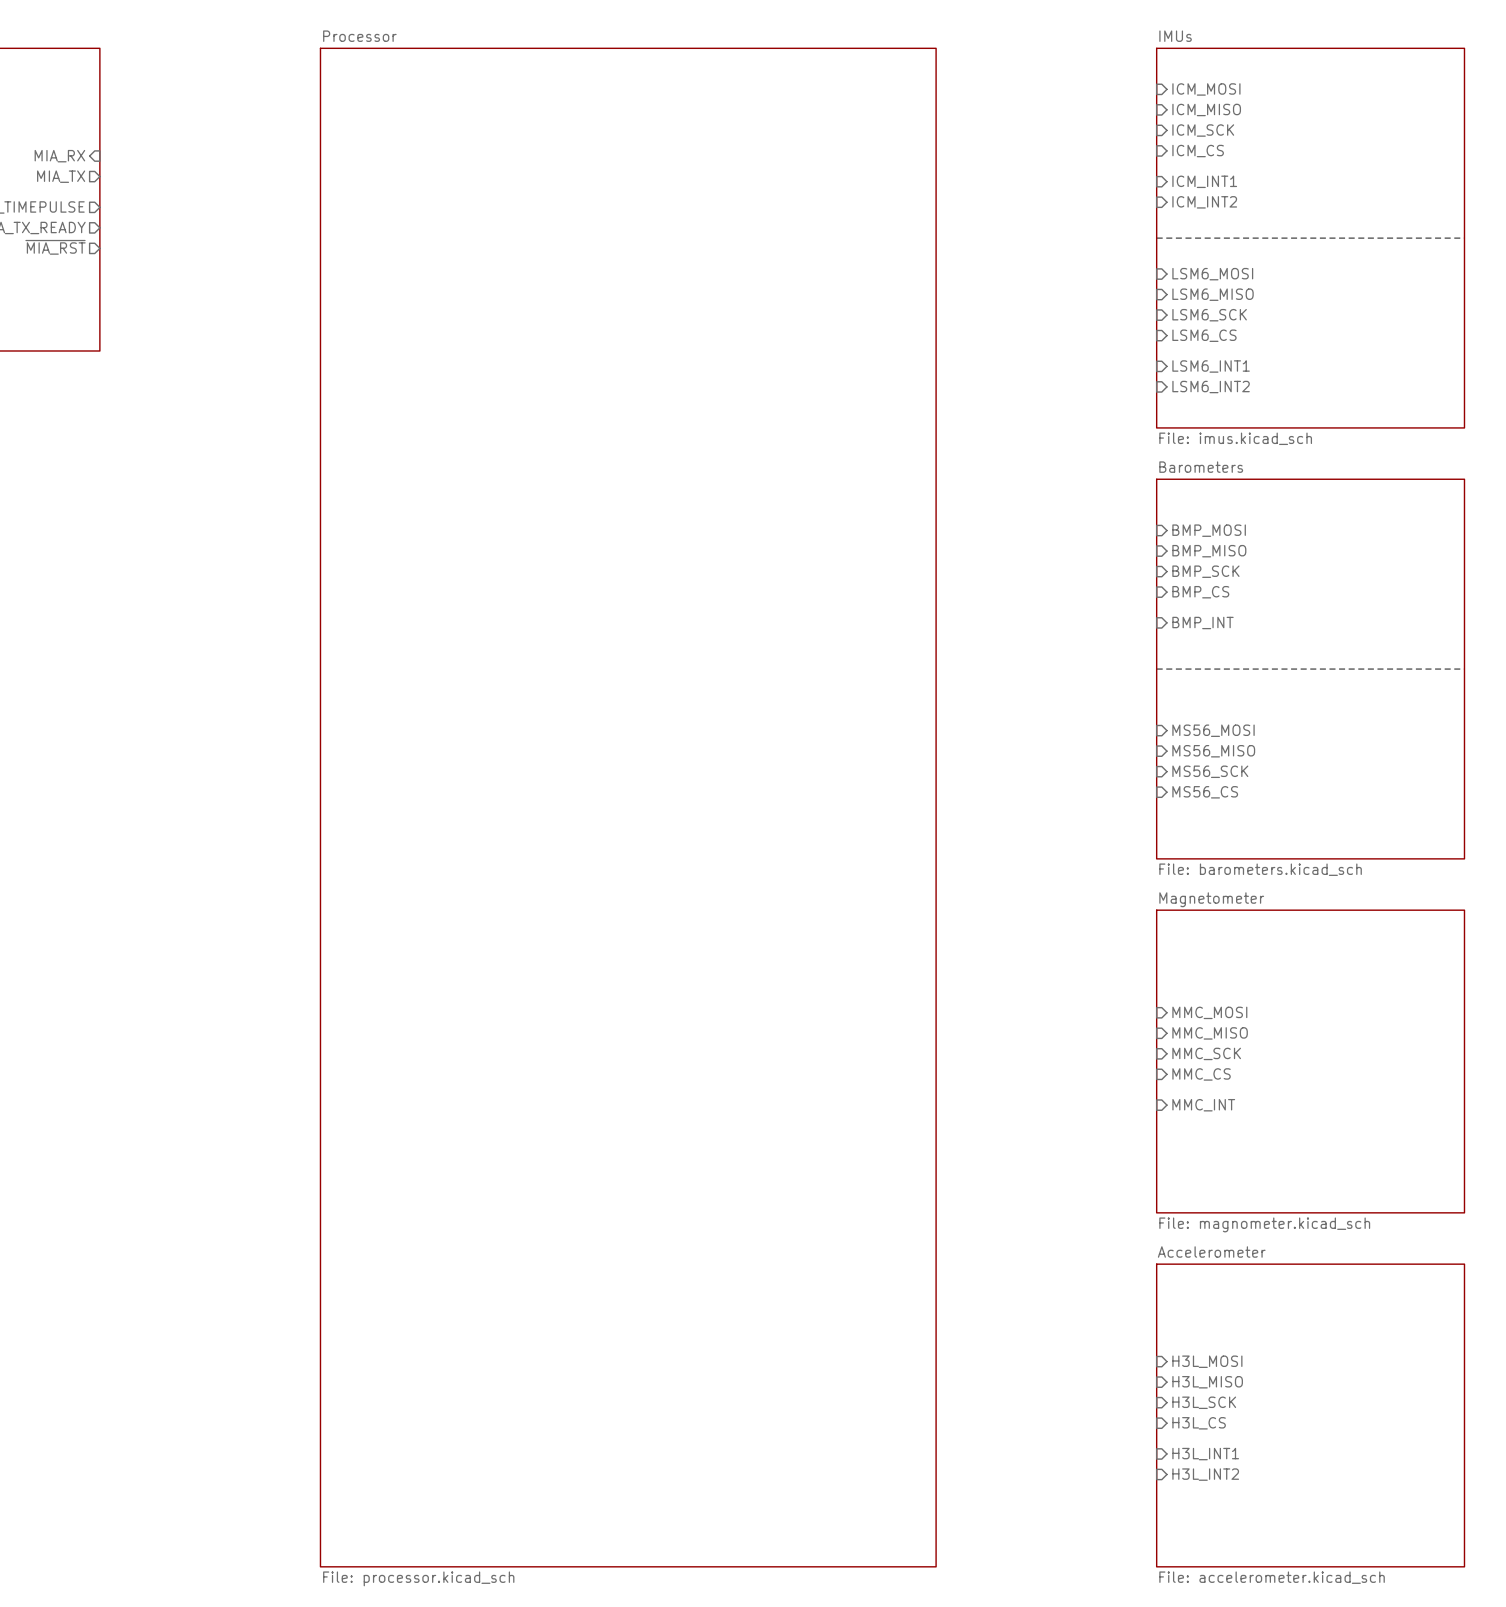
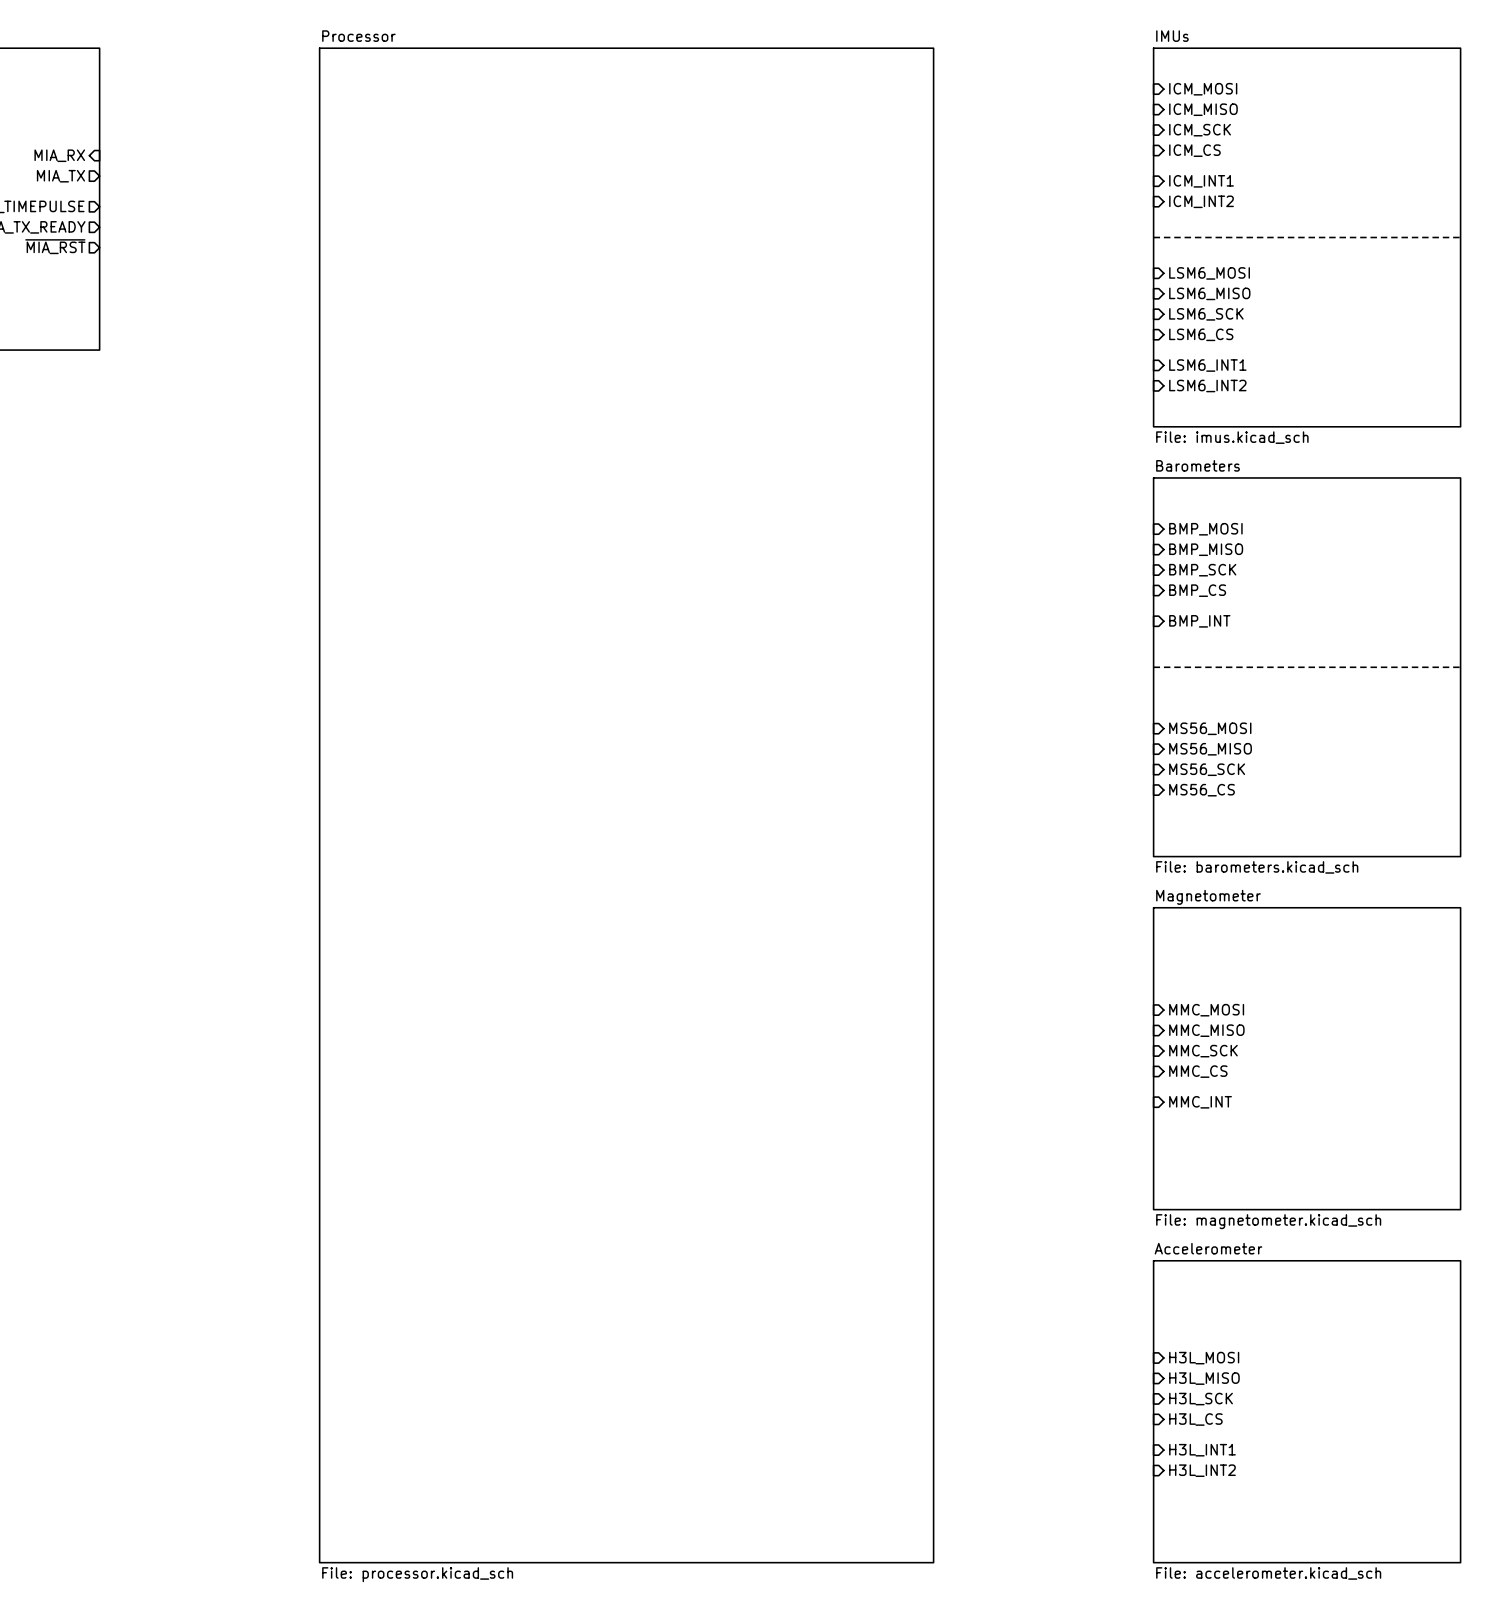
sheet Magnetometer value: File: magnometer.kicad_sch (1264, 1224) -> File: magnetometer.kicad_sch (1268, 1221)

